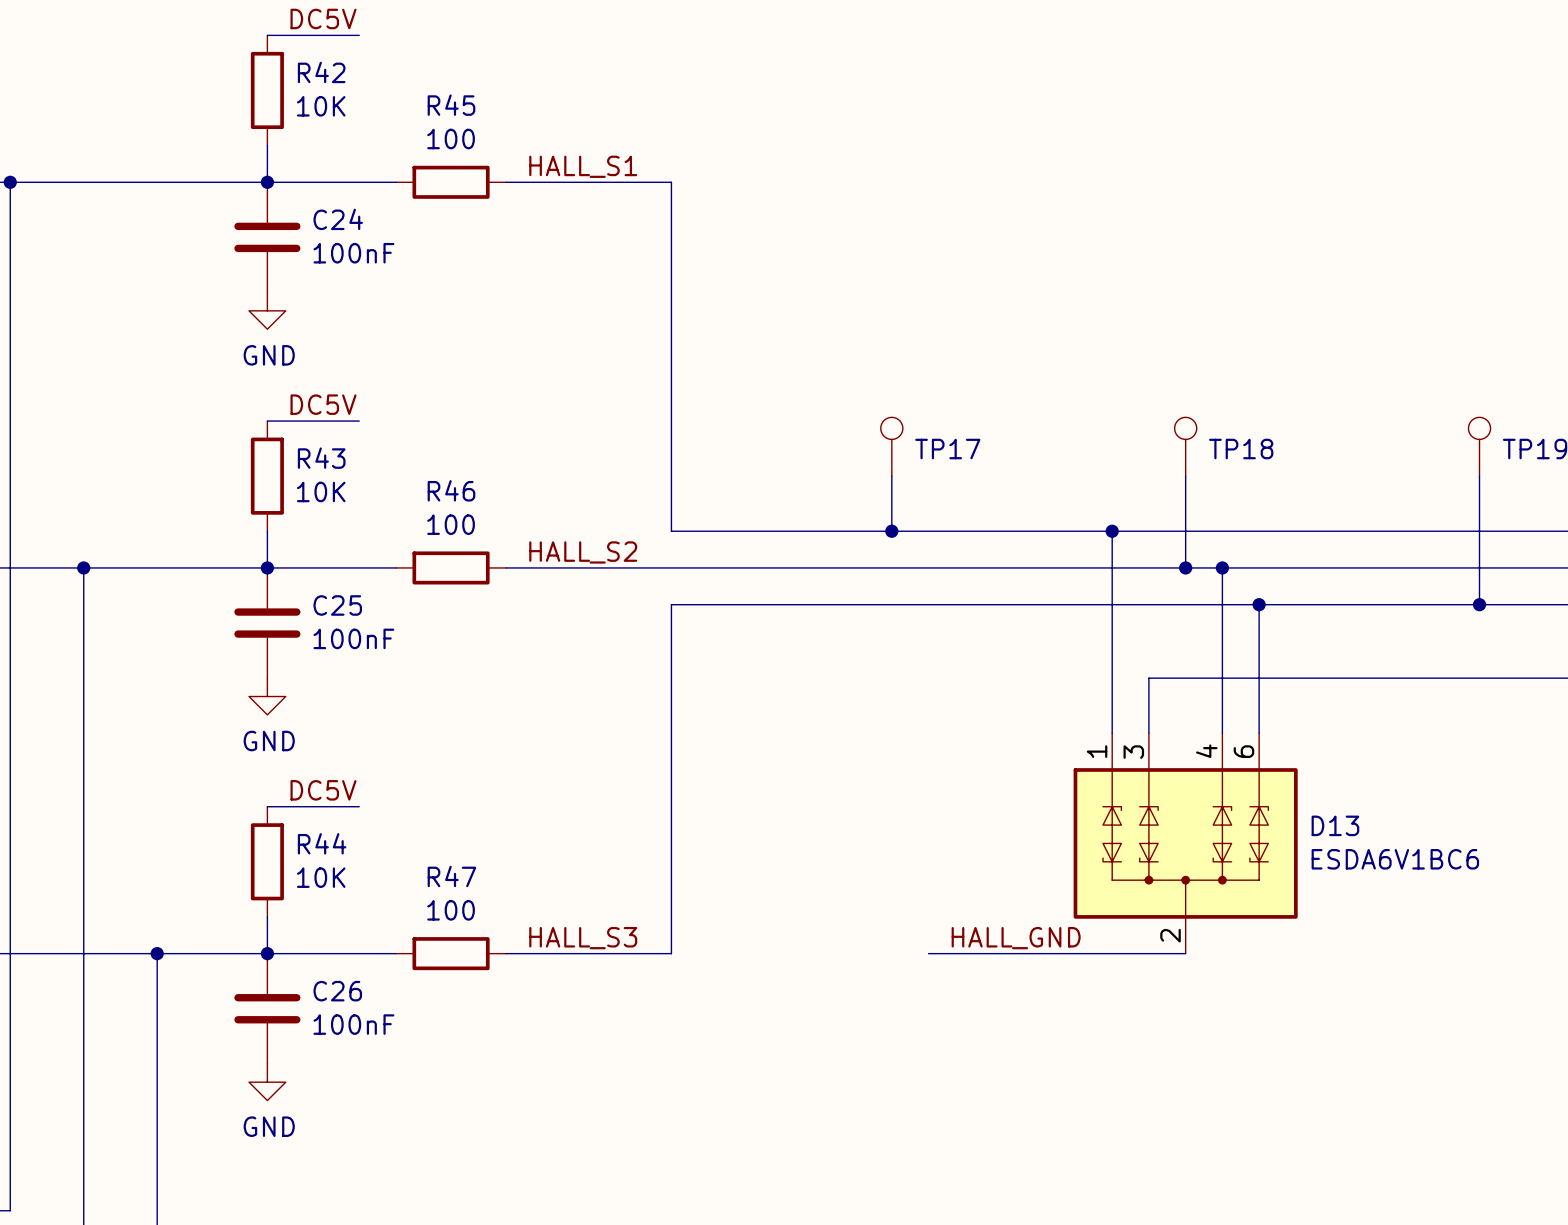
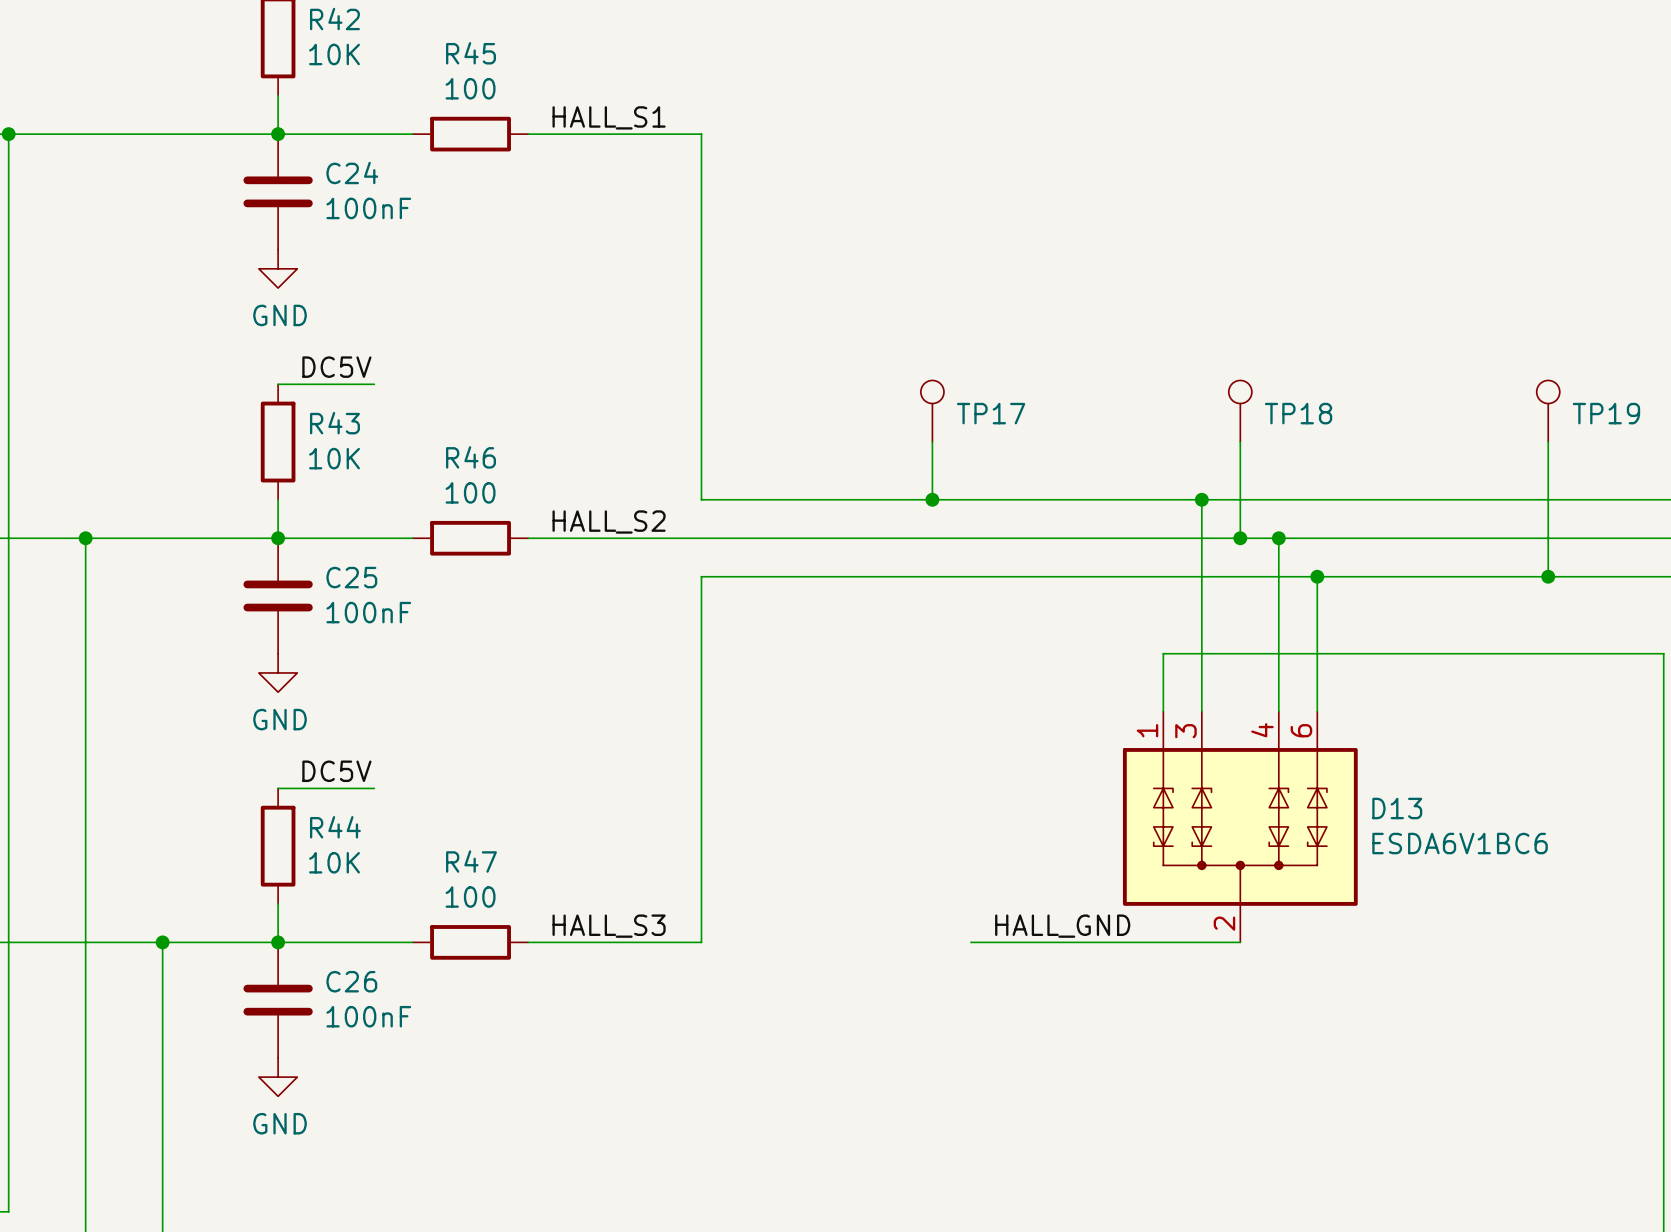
wire: (1112, 531) (1112, 678) -> (1201, 499) (1201, 653) (1163, 653)
junction position: (1112, 531) -> (1201, 499)

